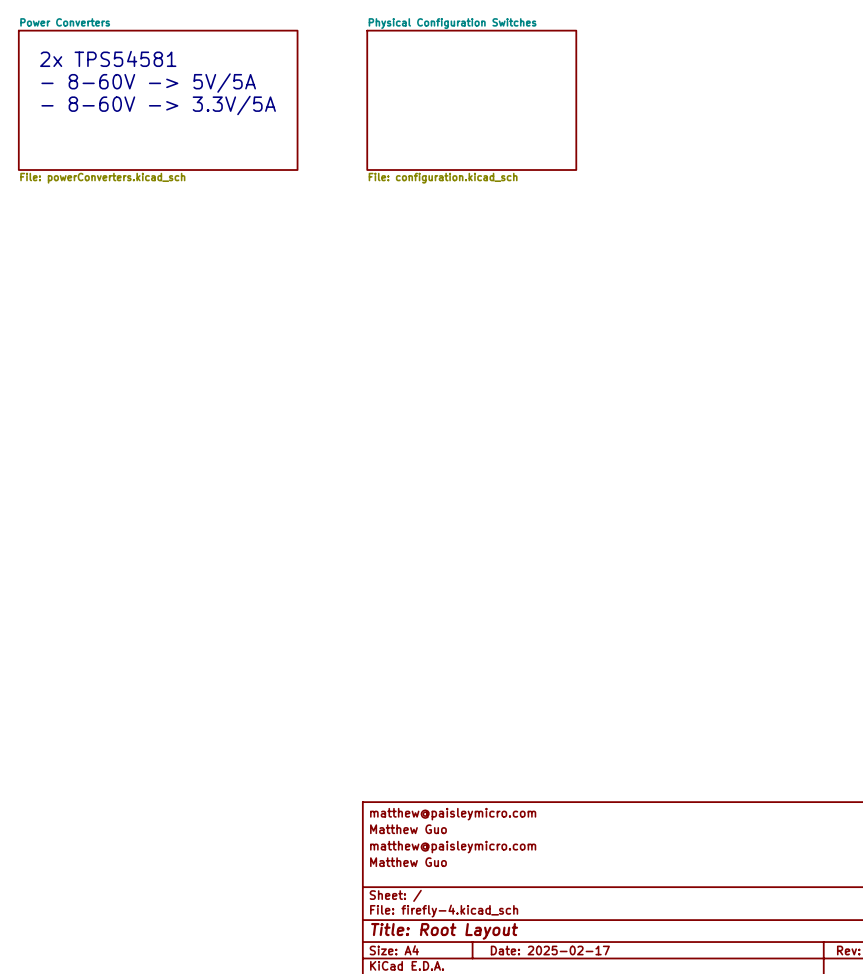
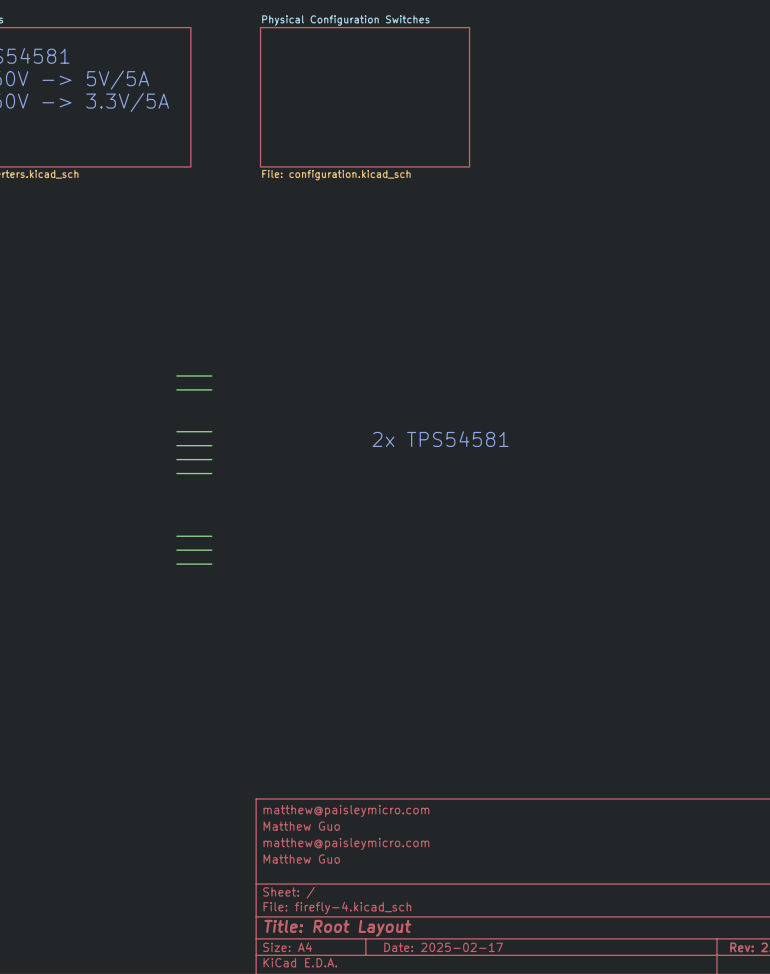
wire: none -> (176, 375) (211, 375)
wire: none -> (176, 389) (211, 389)
wire: none -> (176, 431) (211, 431)
text: none -> 2x TPS54581 (440, 439)
wire: none -> (176, 445) (211, 445)
wire: none -> (176, 459) (211, 459)
wire: none -> (176, 473) (211, 473)
wire: none -> (176, 536) (211, 536)
wire: none -> (176, 550) (211, 550)
wire: none -> (176, 564) (211, 564)

